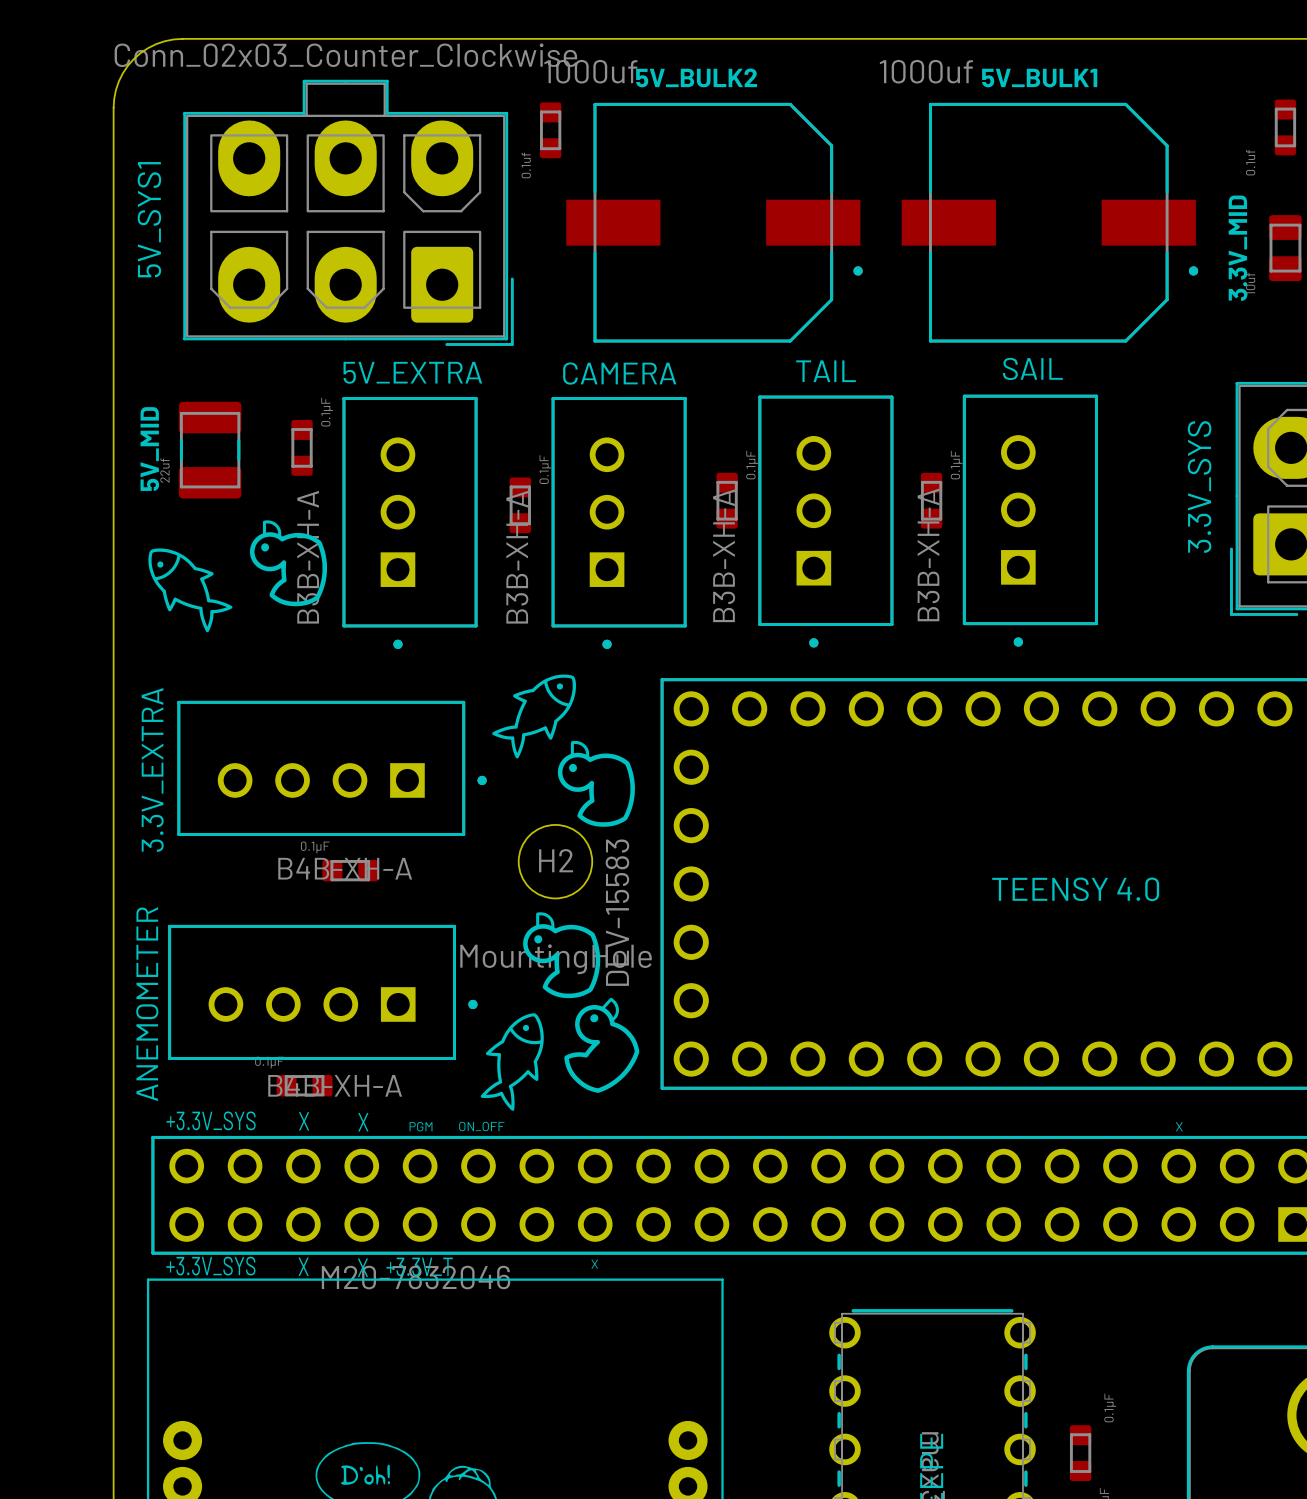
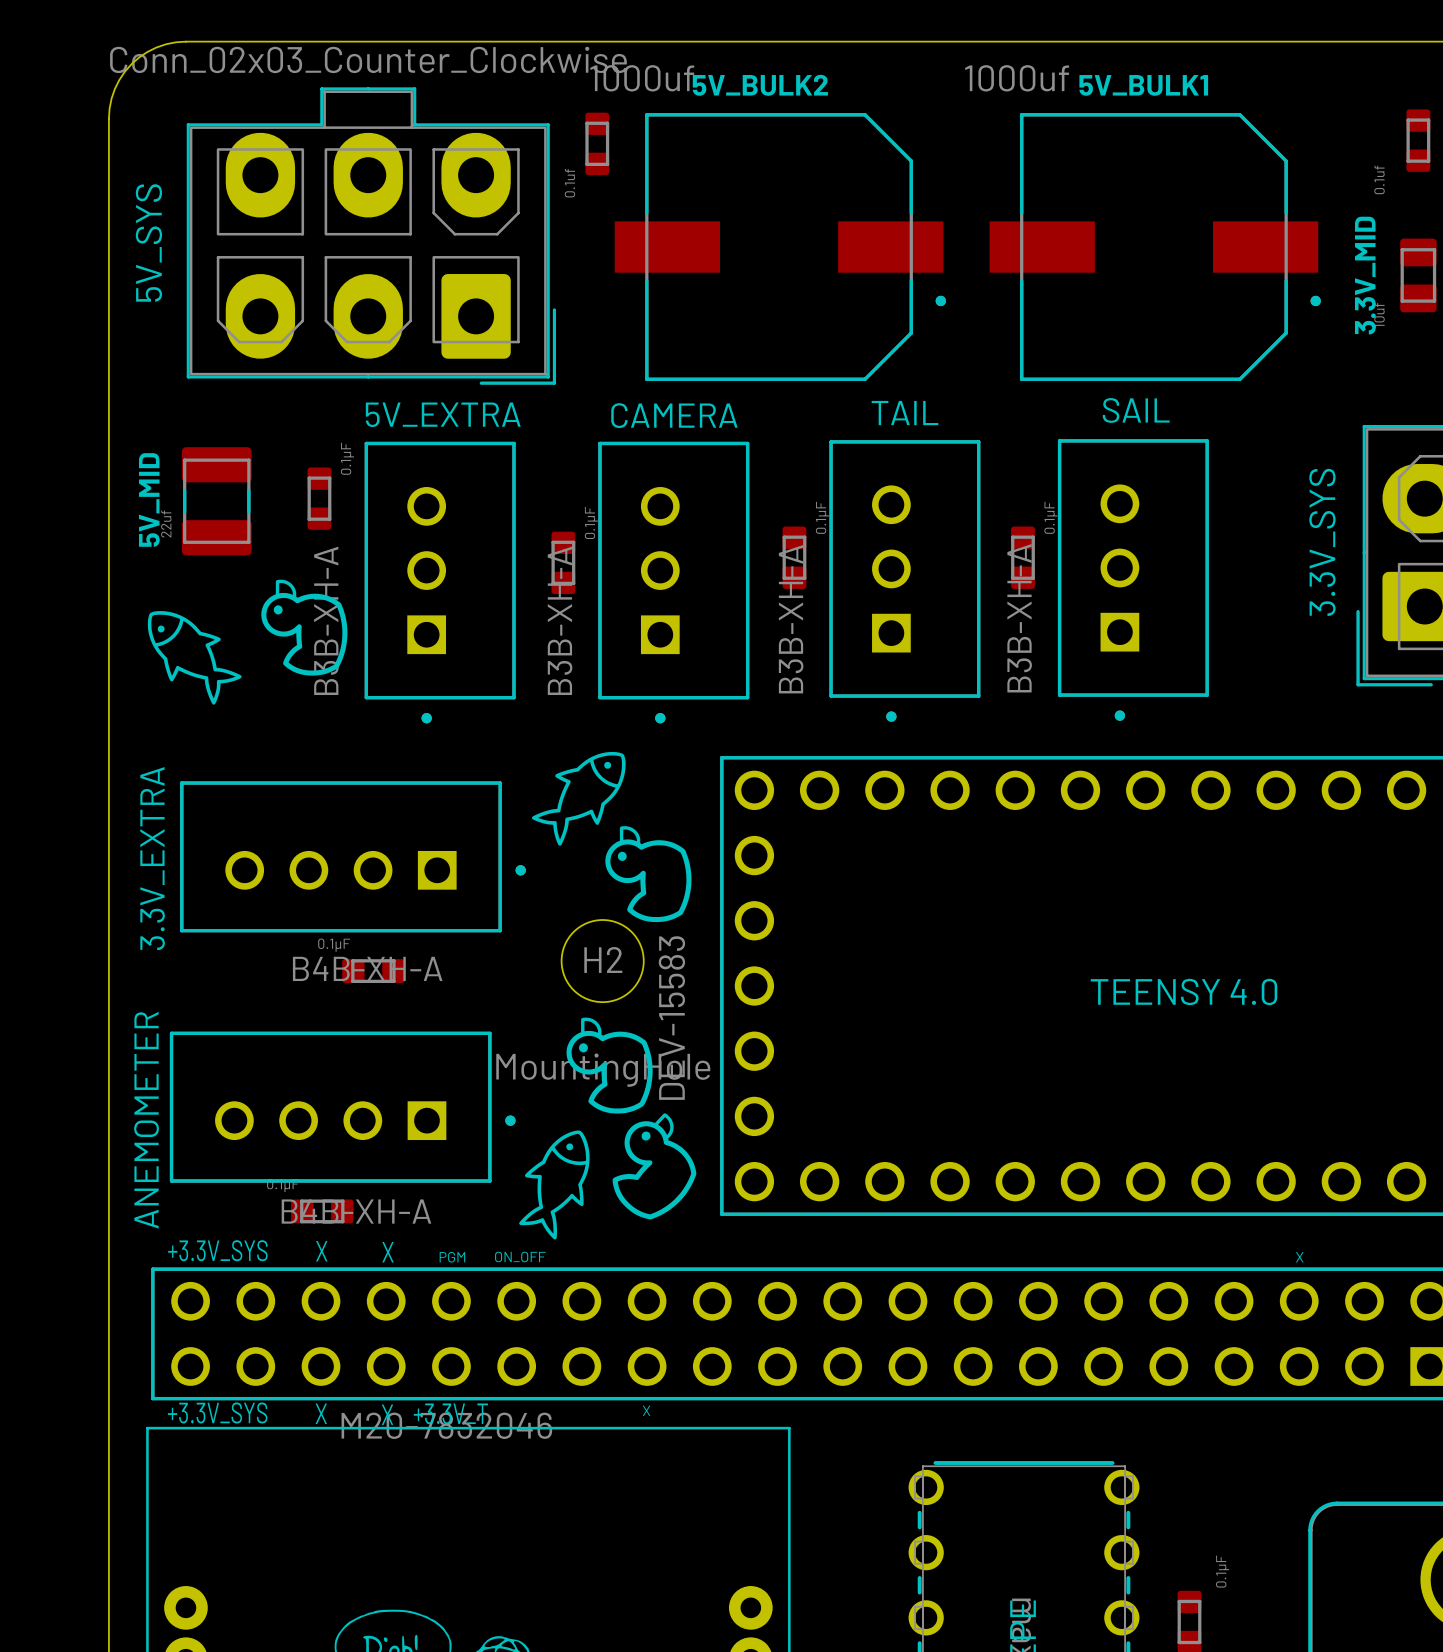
5V_SYS1 name: 5V_SYS1 (149, 219) -> 5V_SYS (148, 242)

